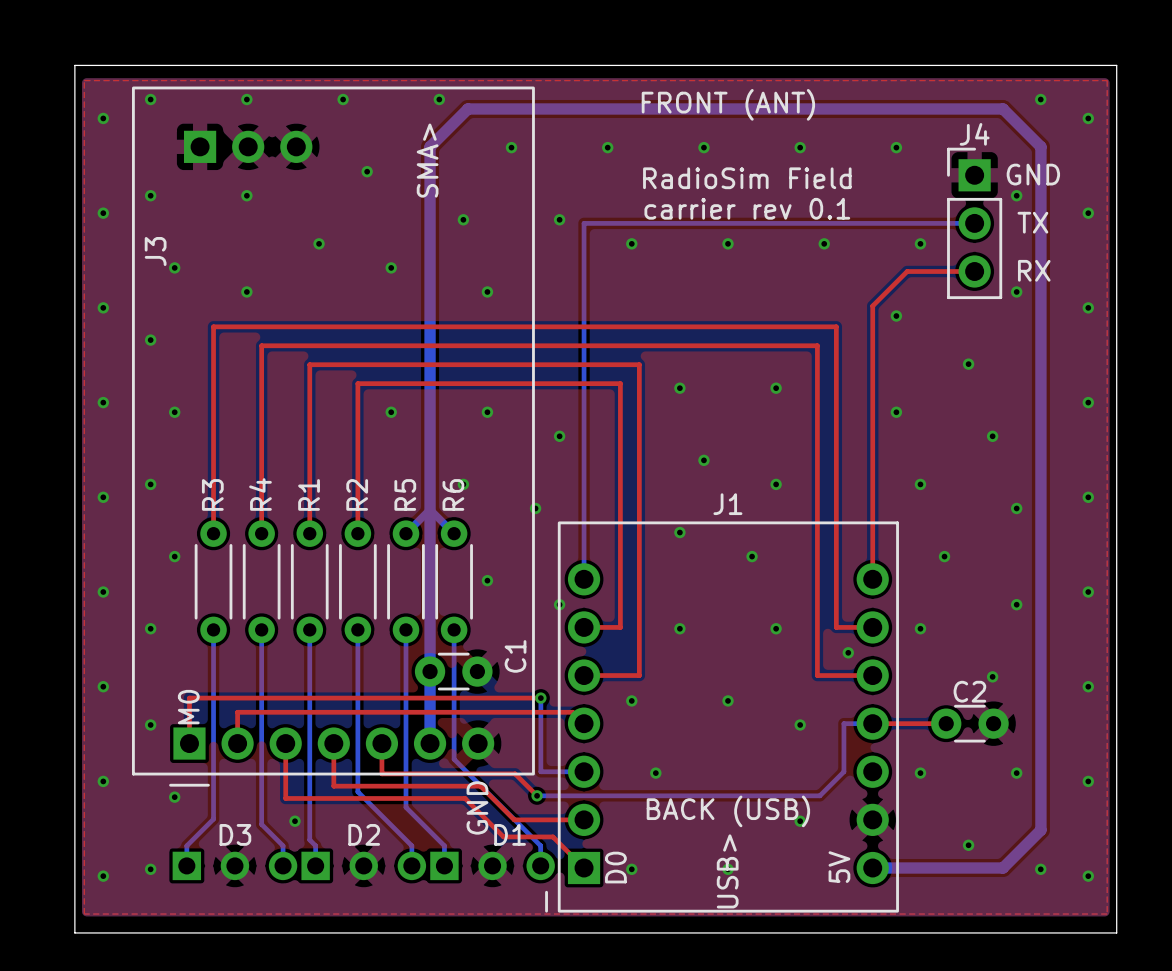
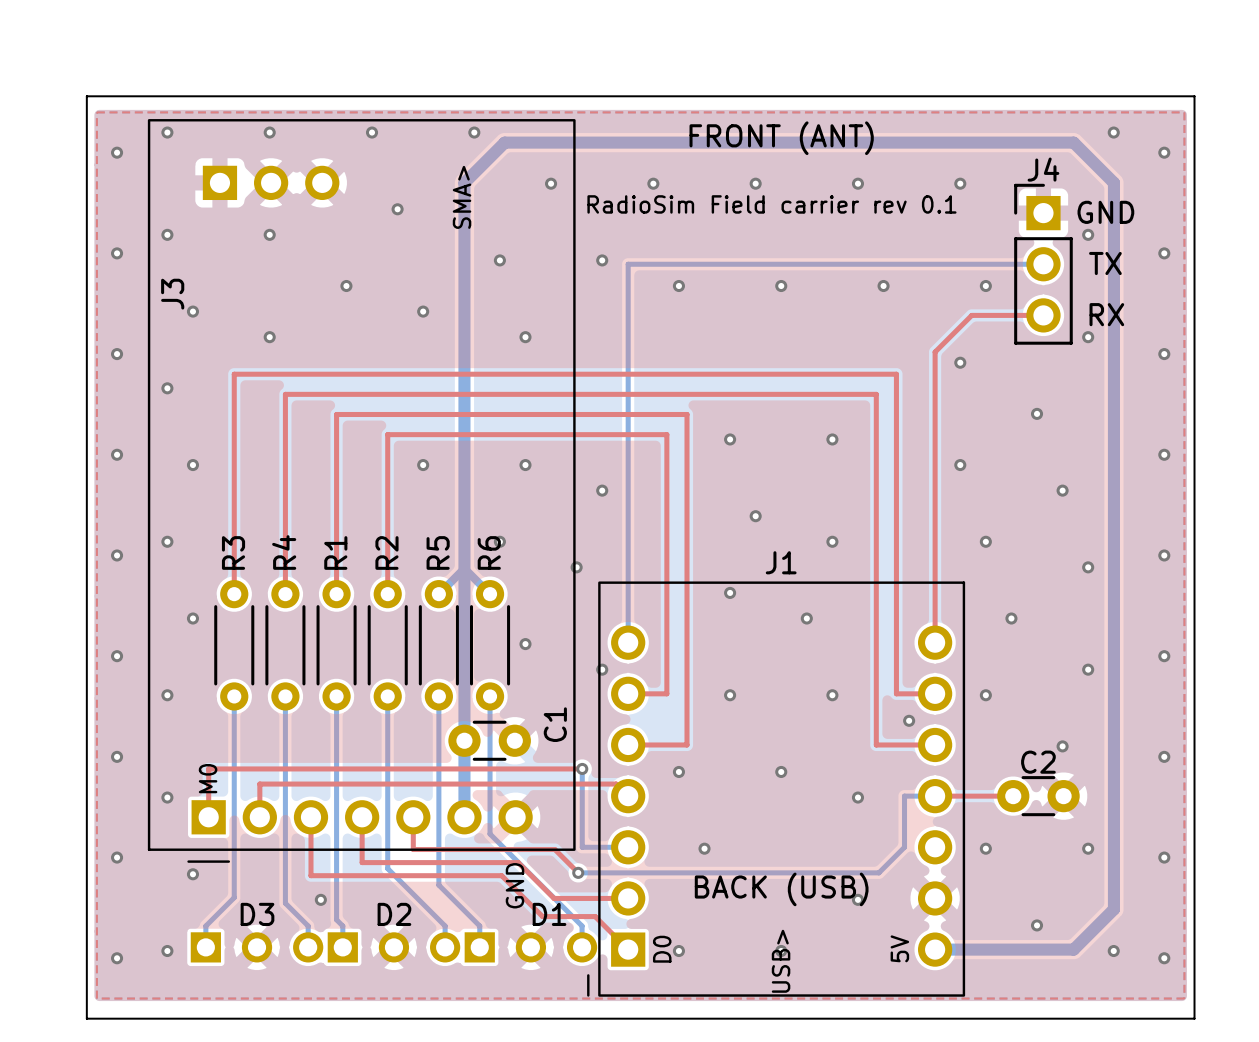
J3 footprint: [131, 86, 535, 787] -> [147, 119, 576, 863]
text: RadioSim Field (747, 178) -> RadioSim Field carrier rev 0.1 (771, 204)
text: carrier rev 0.1 (747, 208) -> none
J1 footprint: [545, 521, 899, 913] -> [587, 581, 966, 997]

